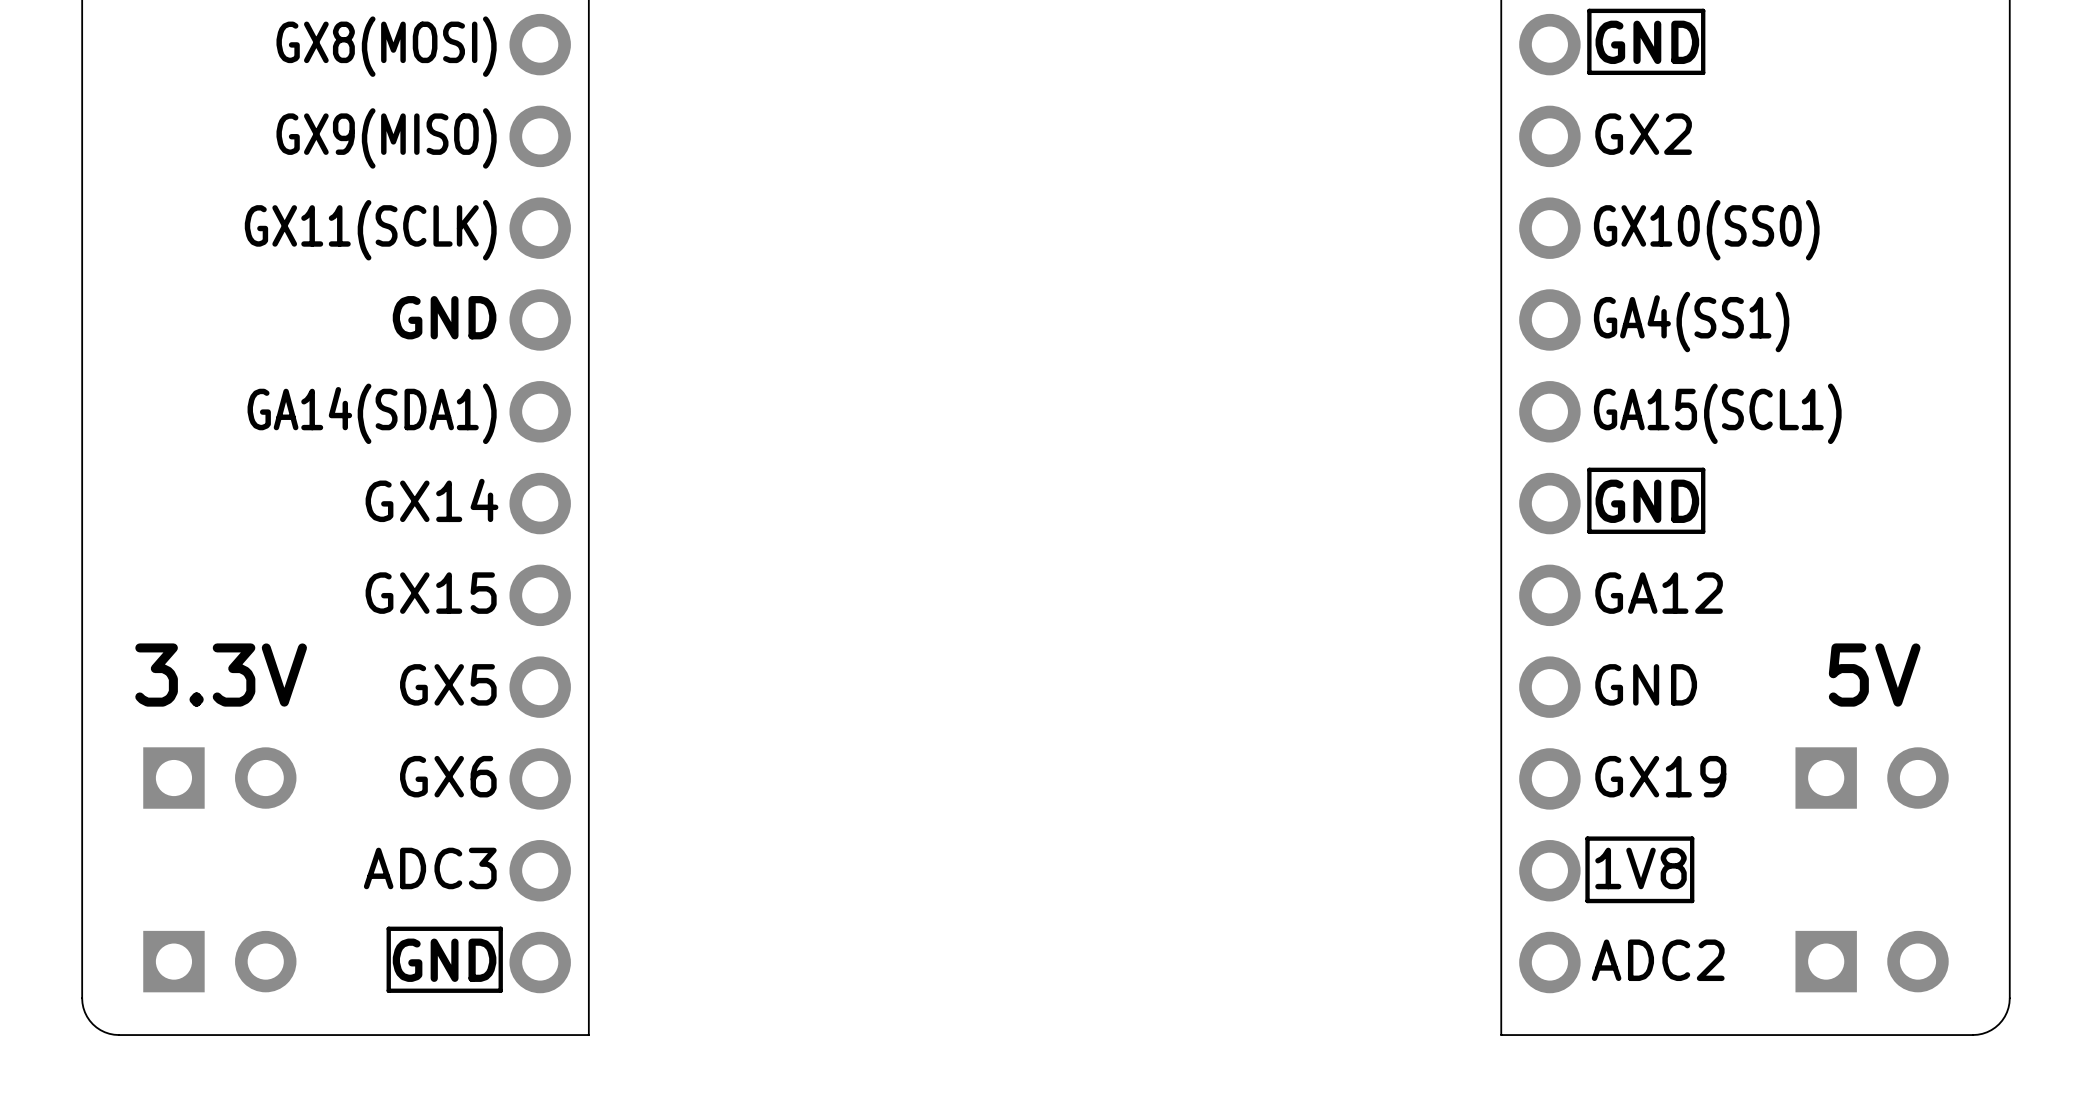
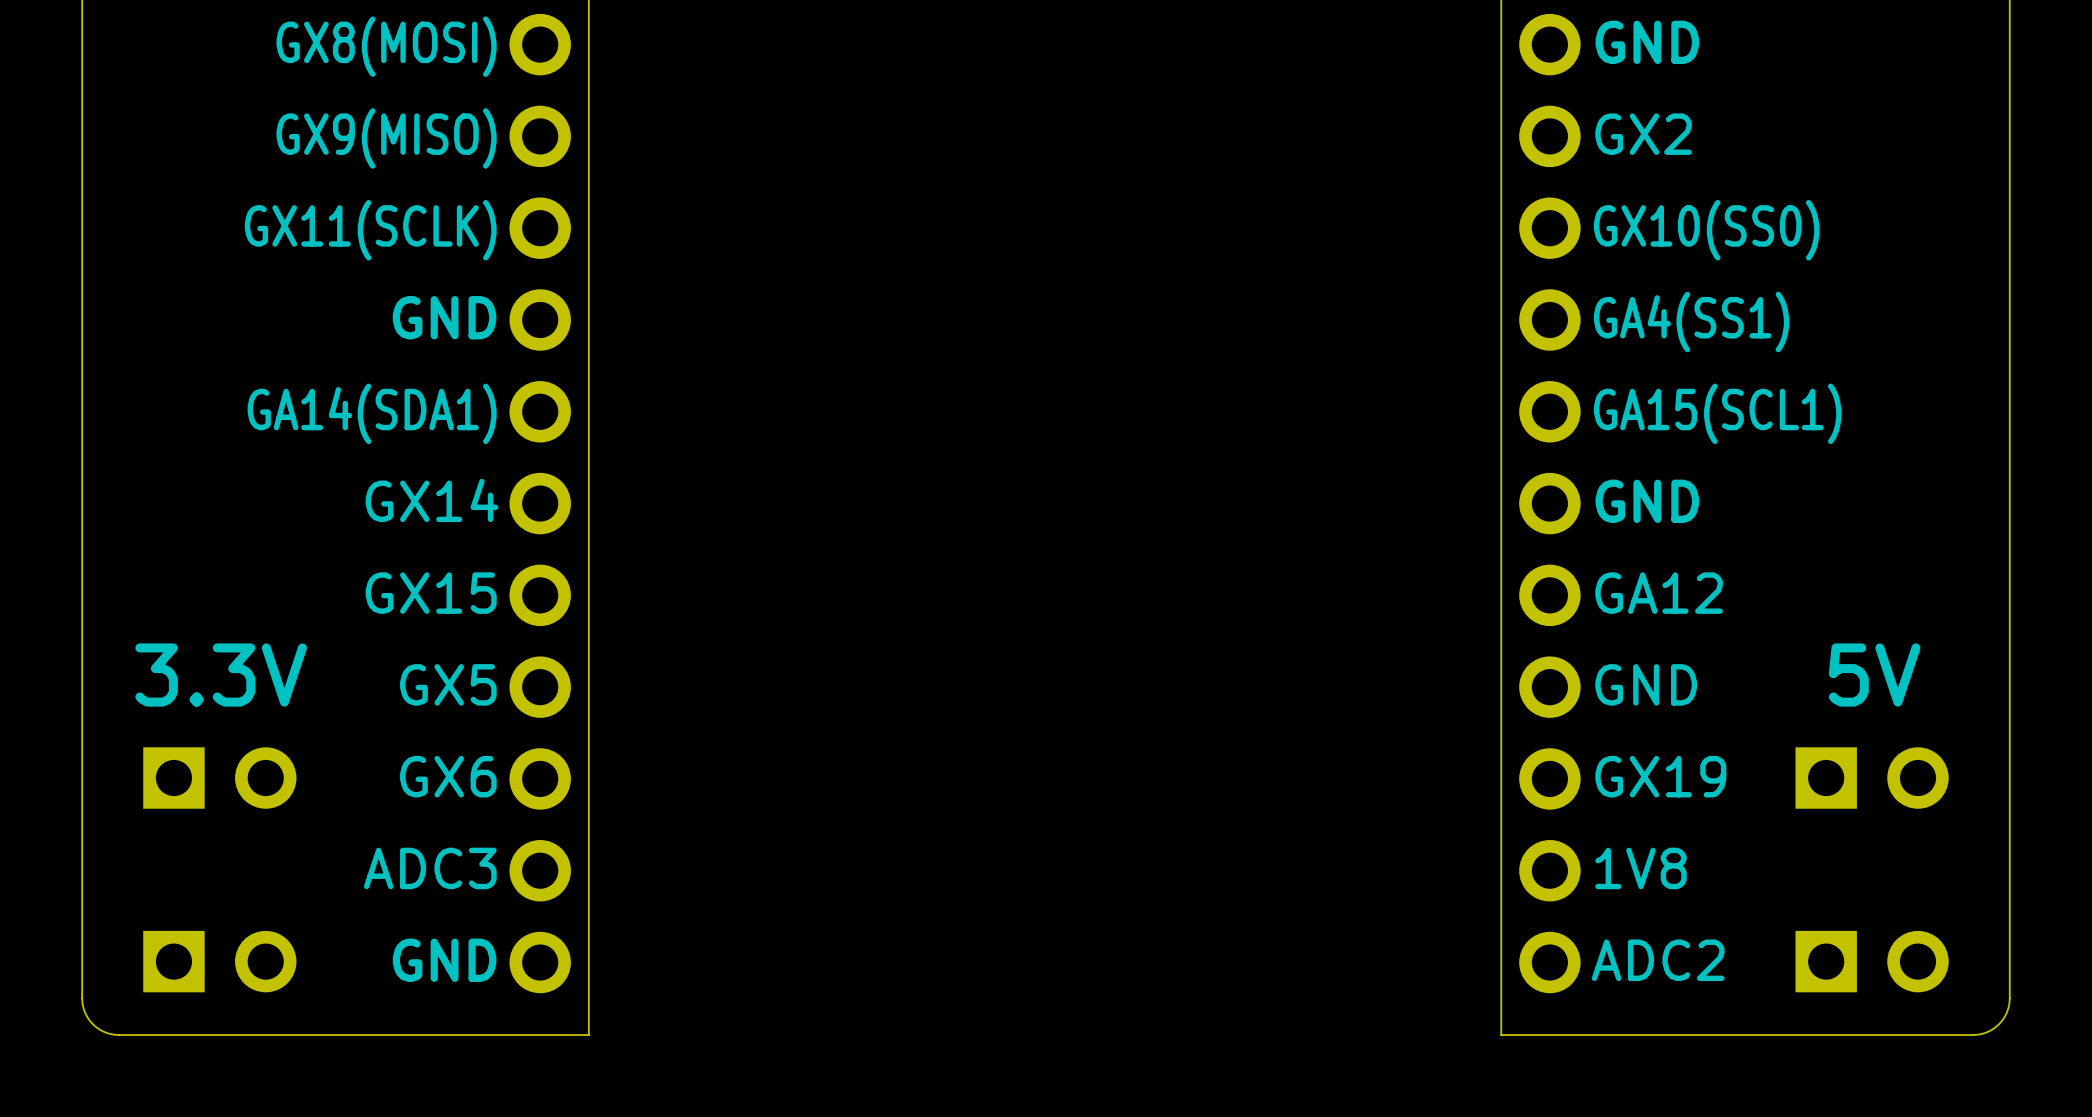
line: (1589, 10) (1589, 72) (1703, 72) (1703, 10) (1589, 10) -> none
line: (1589, 469) (1589, 531) (1703, 531) (1703, 469) (1589, 469) -> none
line: (1587, 838) (1692, 838) (1692, 901) (1587, 901) (1587, 838) -> none
line: (388, 928) (388, 990) (500, 990) (500, 928) (388, 928) -> none

